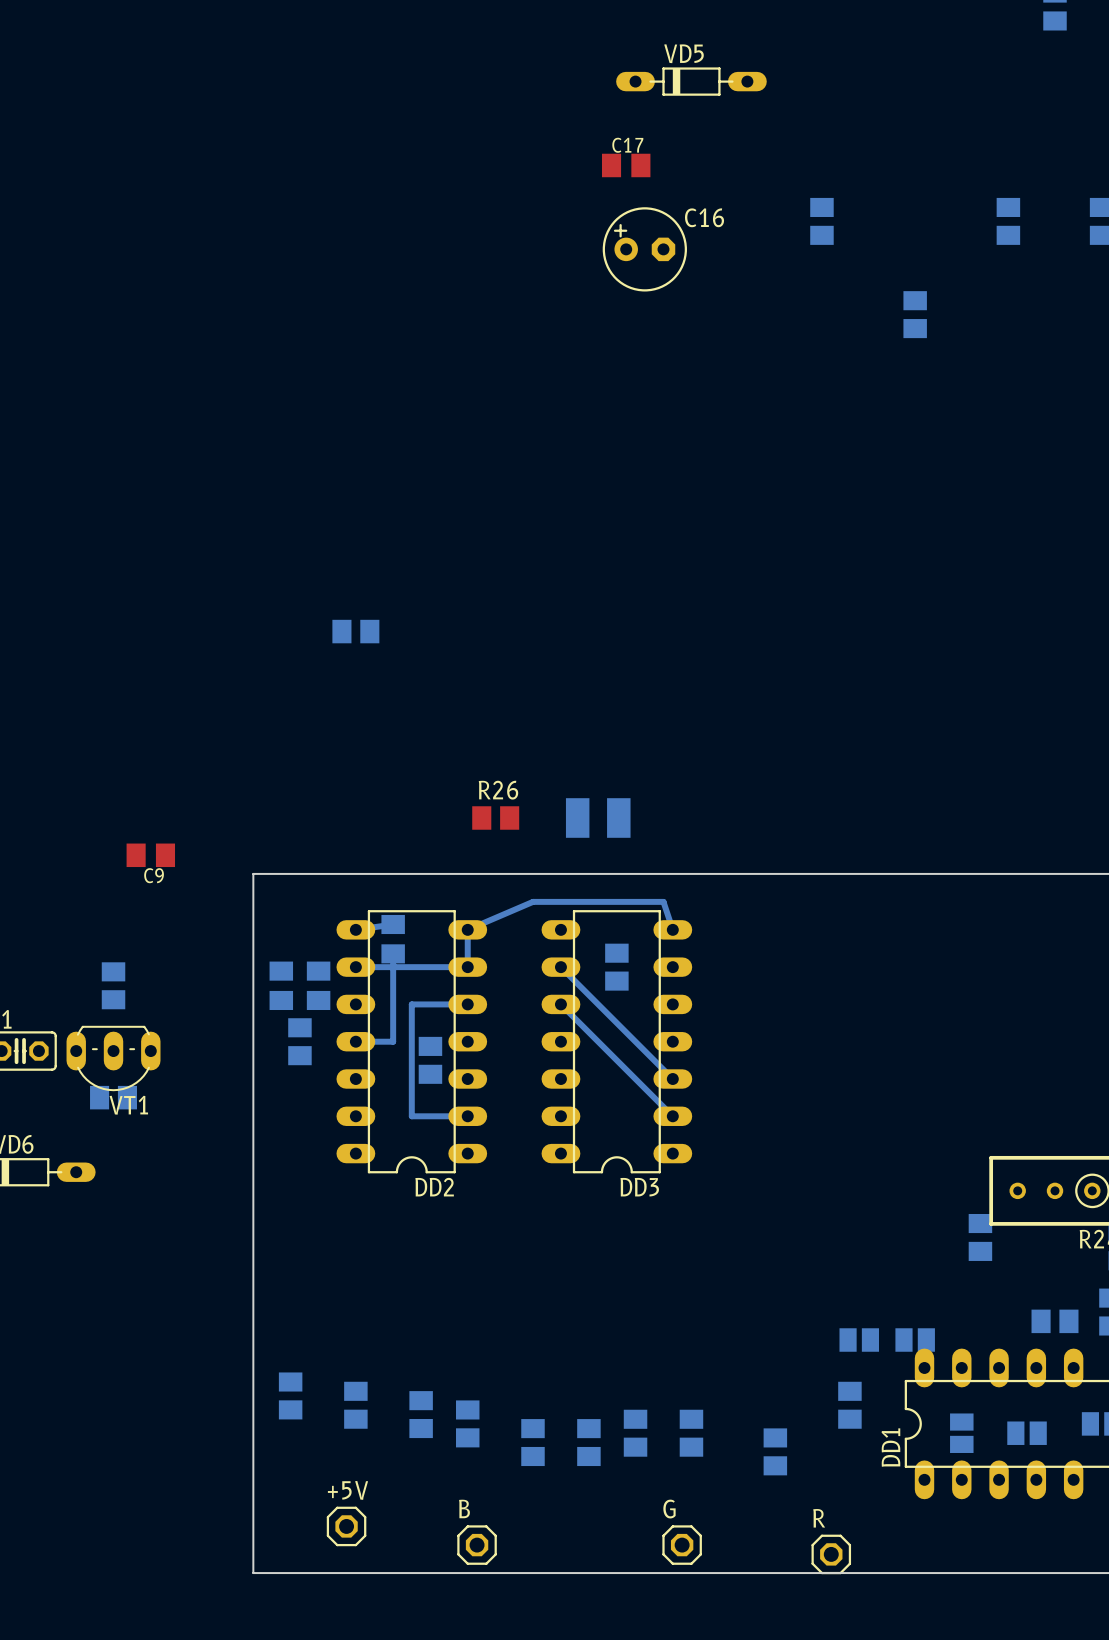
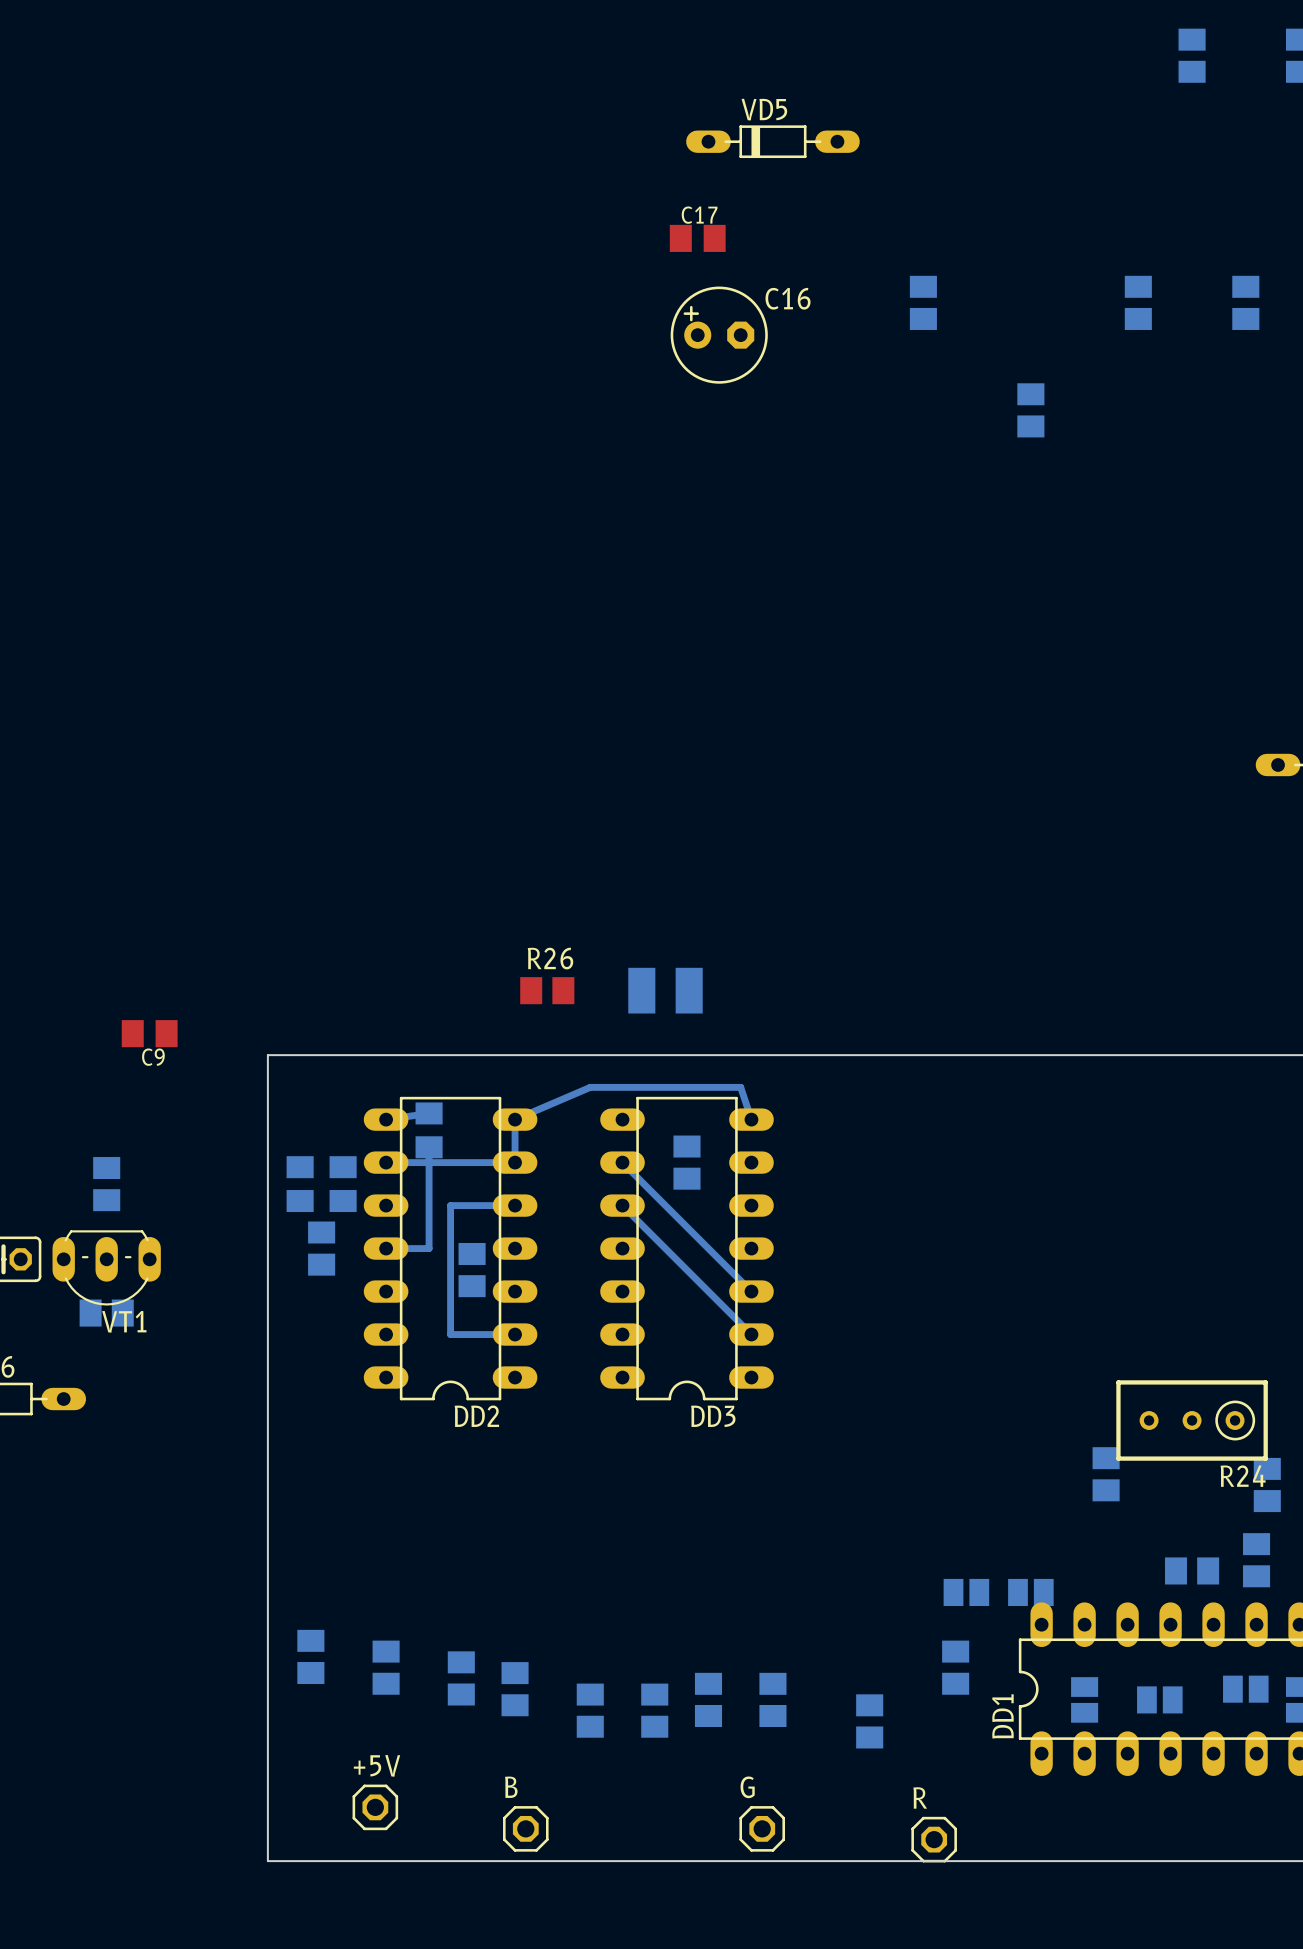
part: (355, 631) -> none

